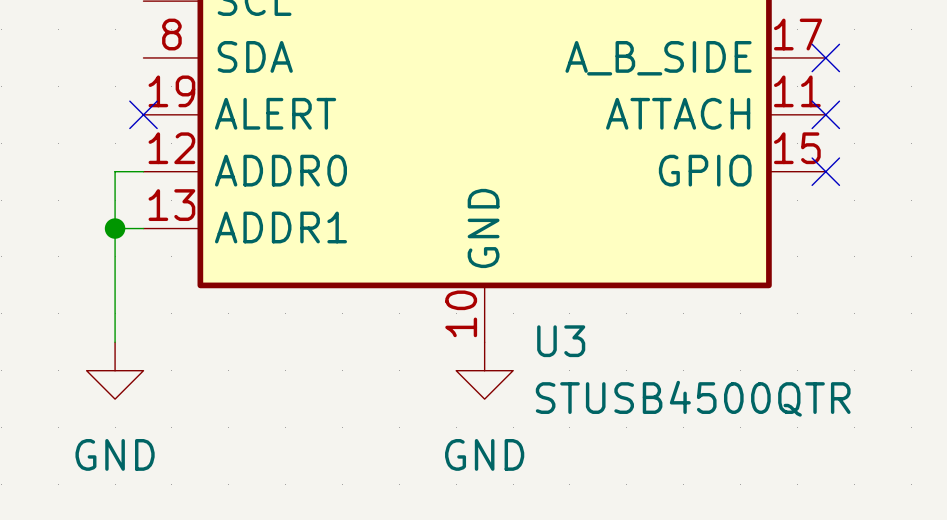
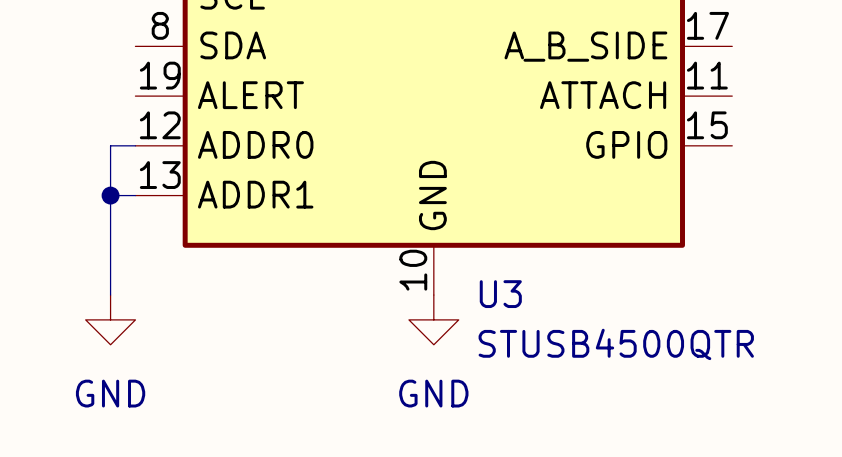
no-connect mark: (825, 57) -> none
no-connect mark: (143, 114) -> none
no-connect mark: (825, 114) -> none
no-connect mark: (825, 171) -> none

